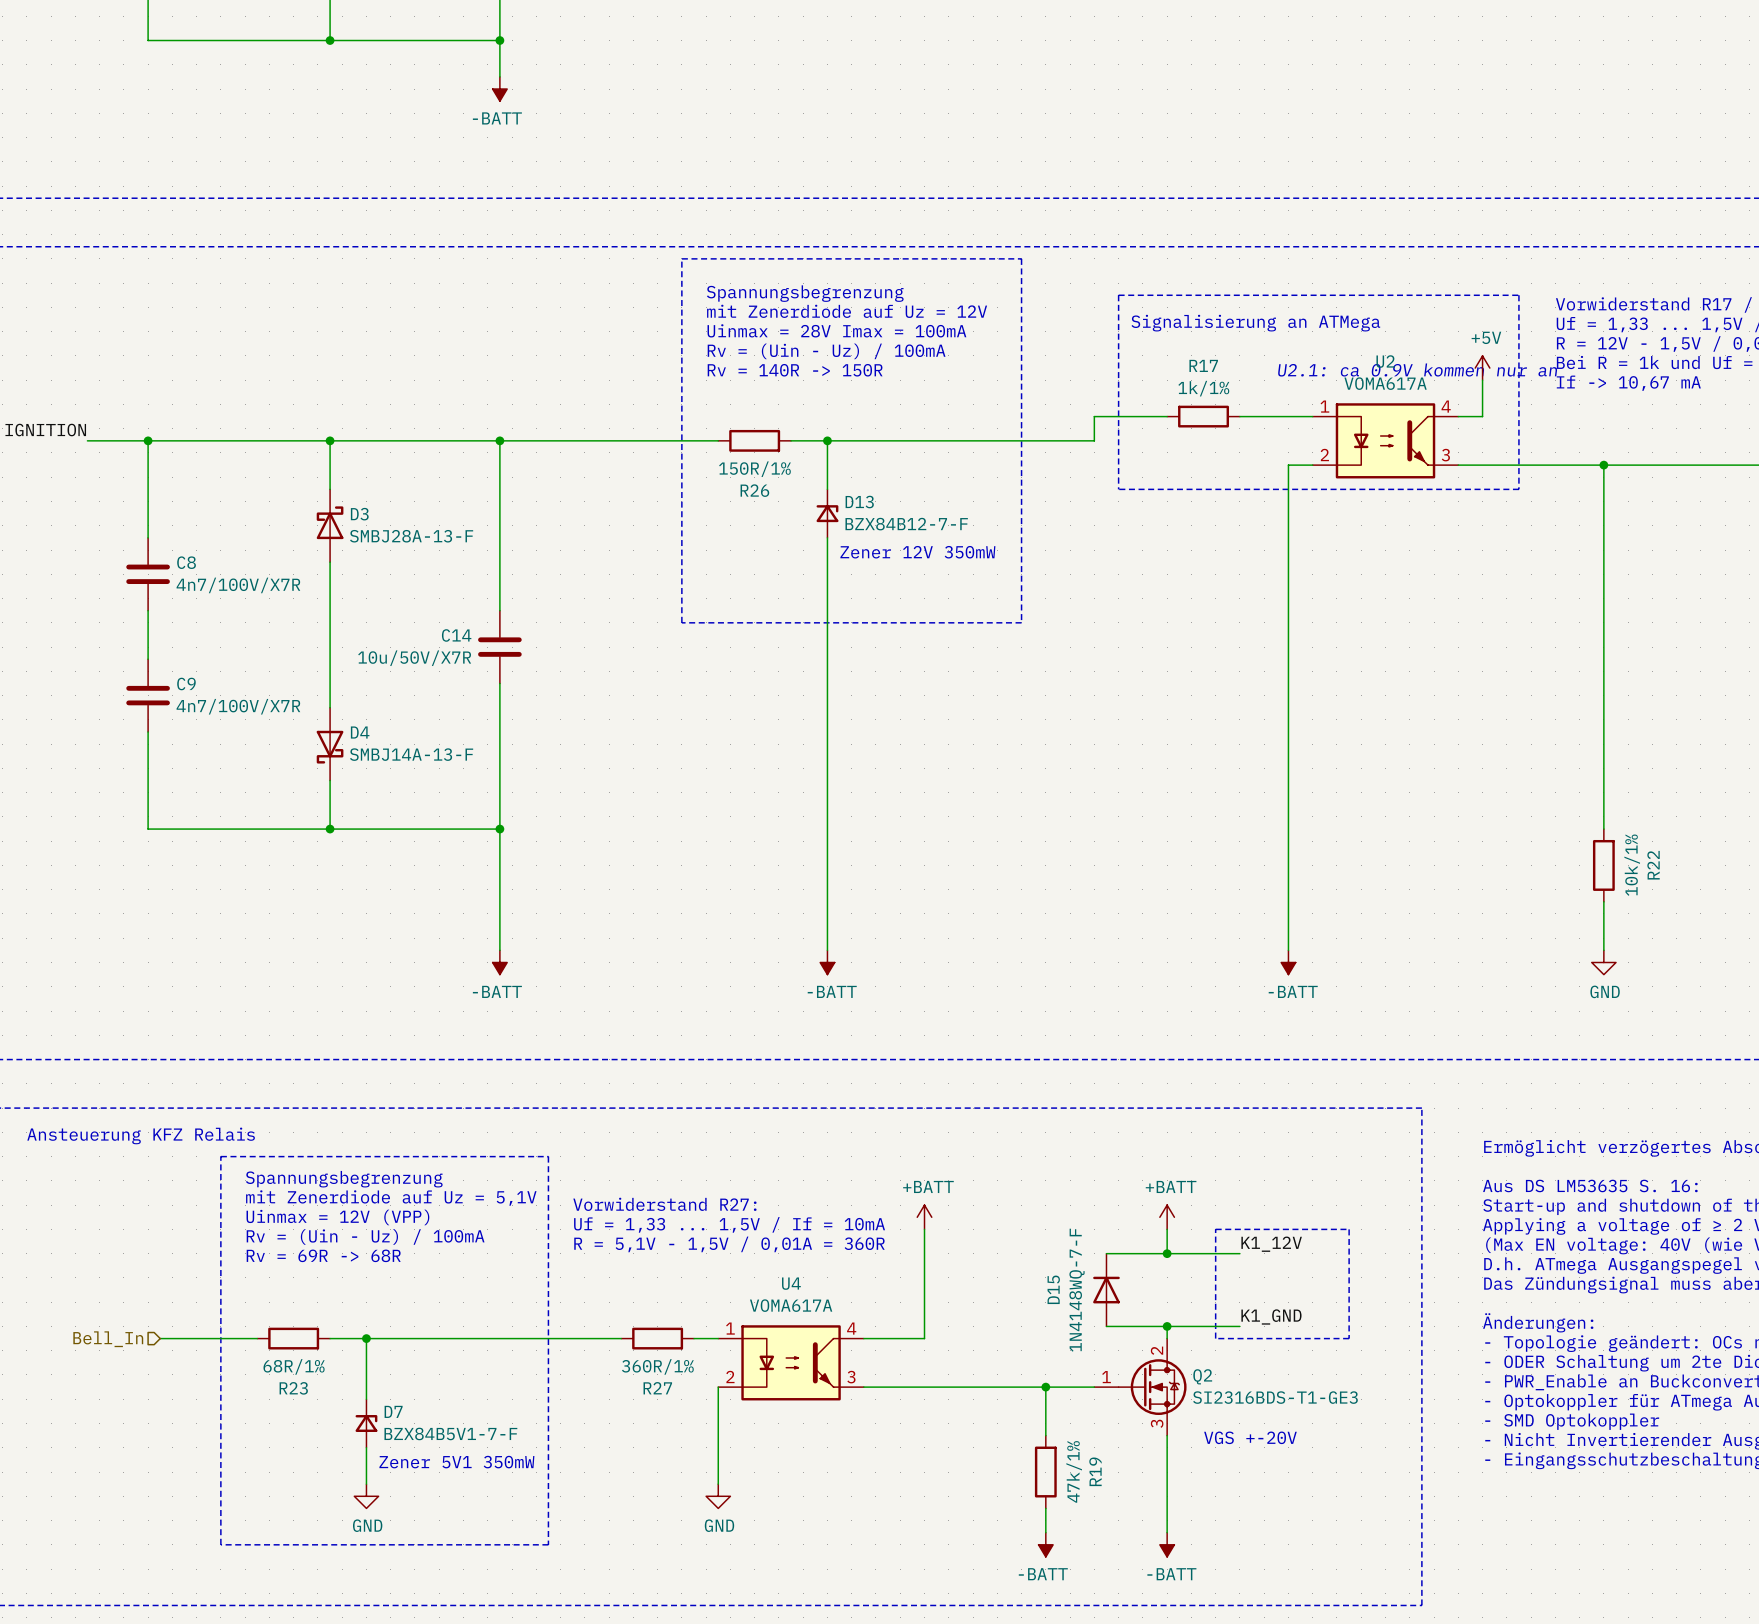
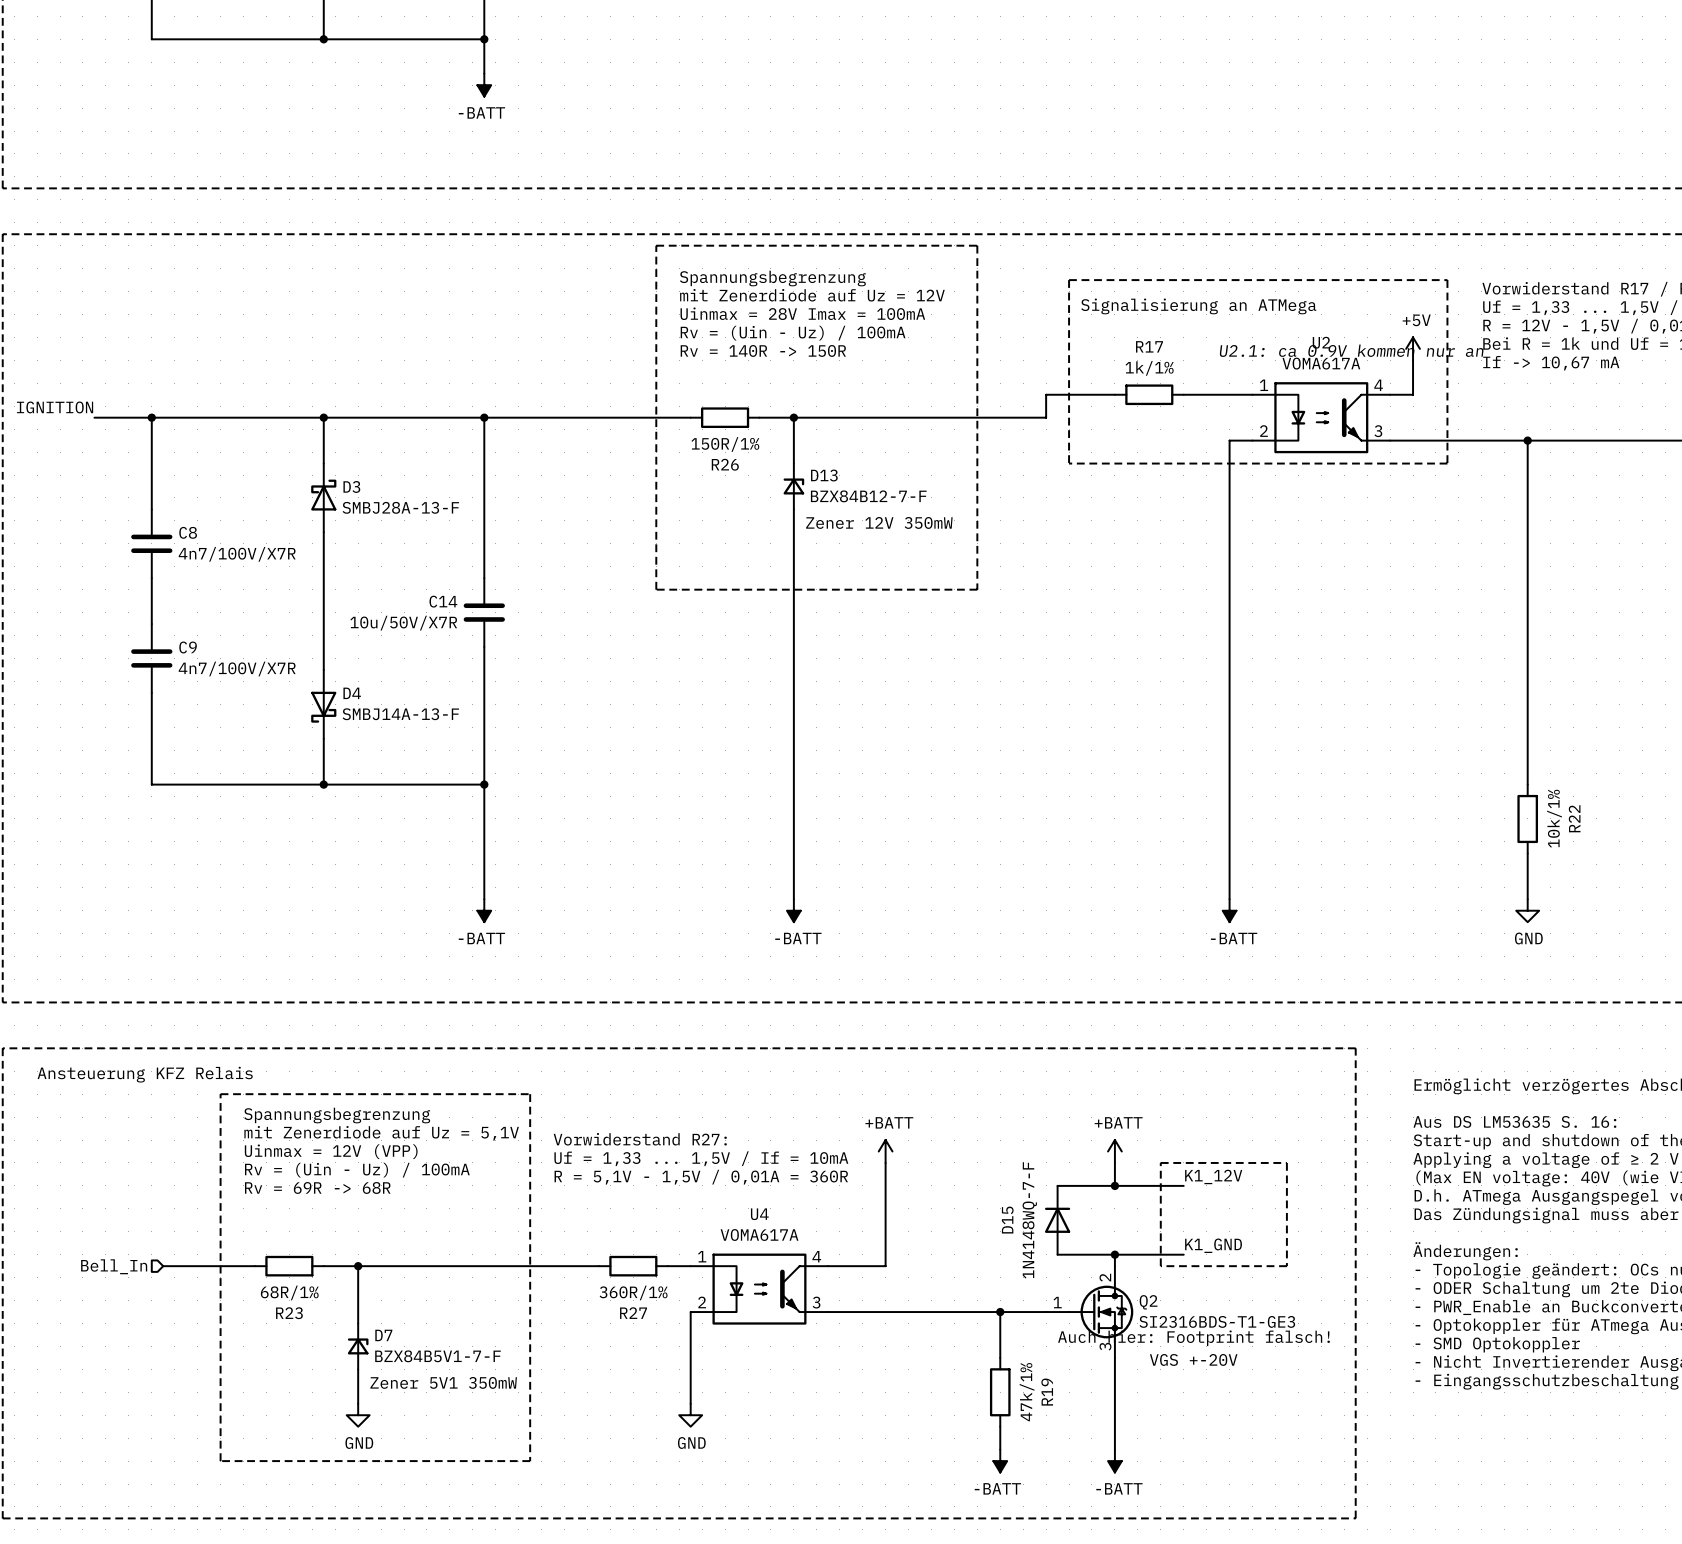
text: none -> Auch hier: Footprint falsch! (1193, 1338)

